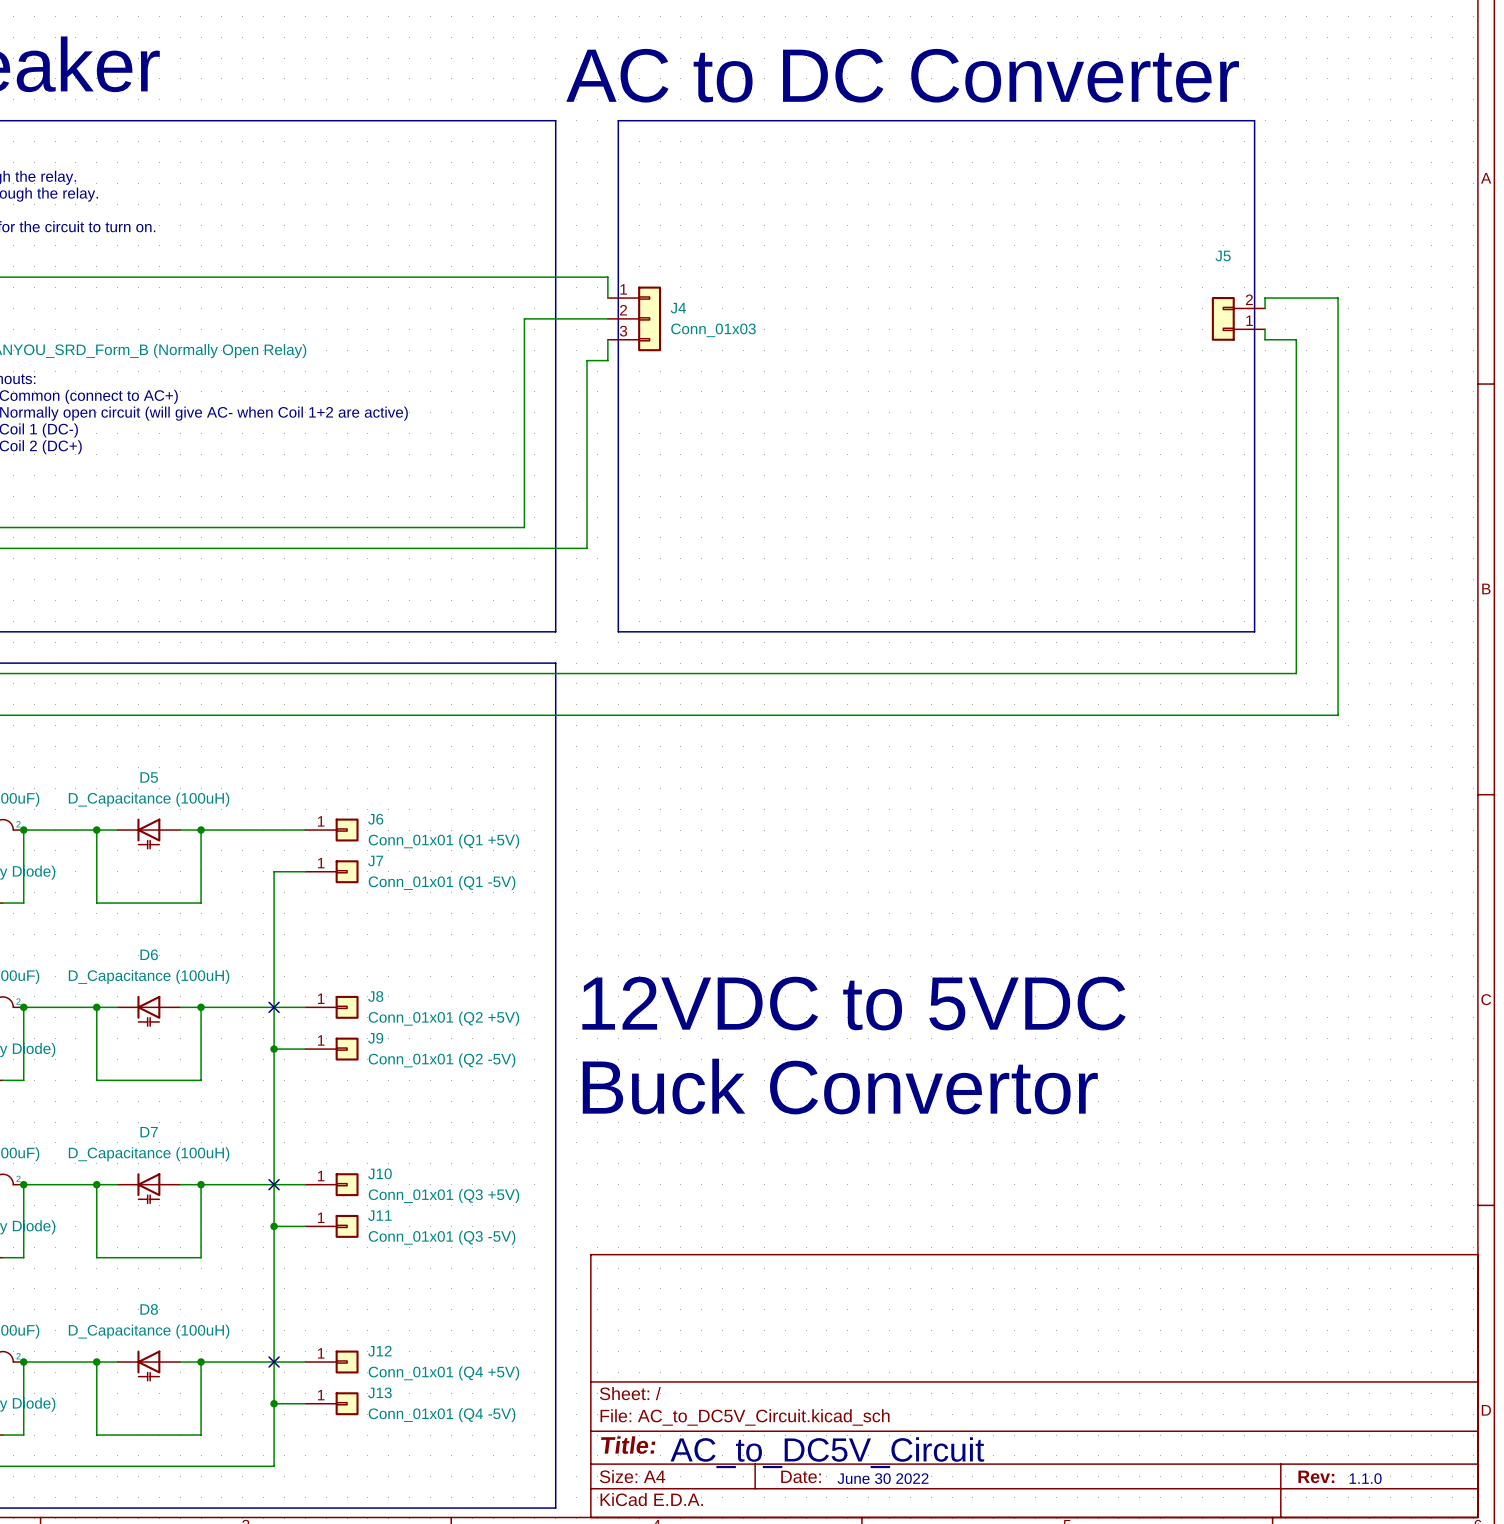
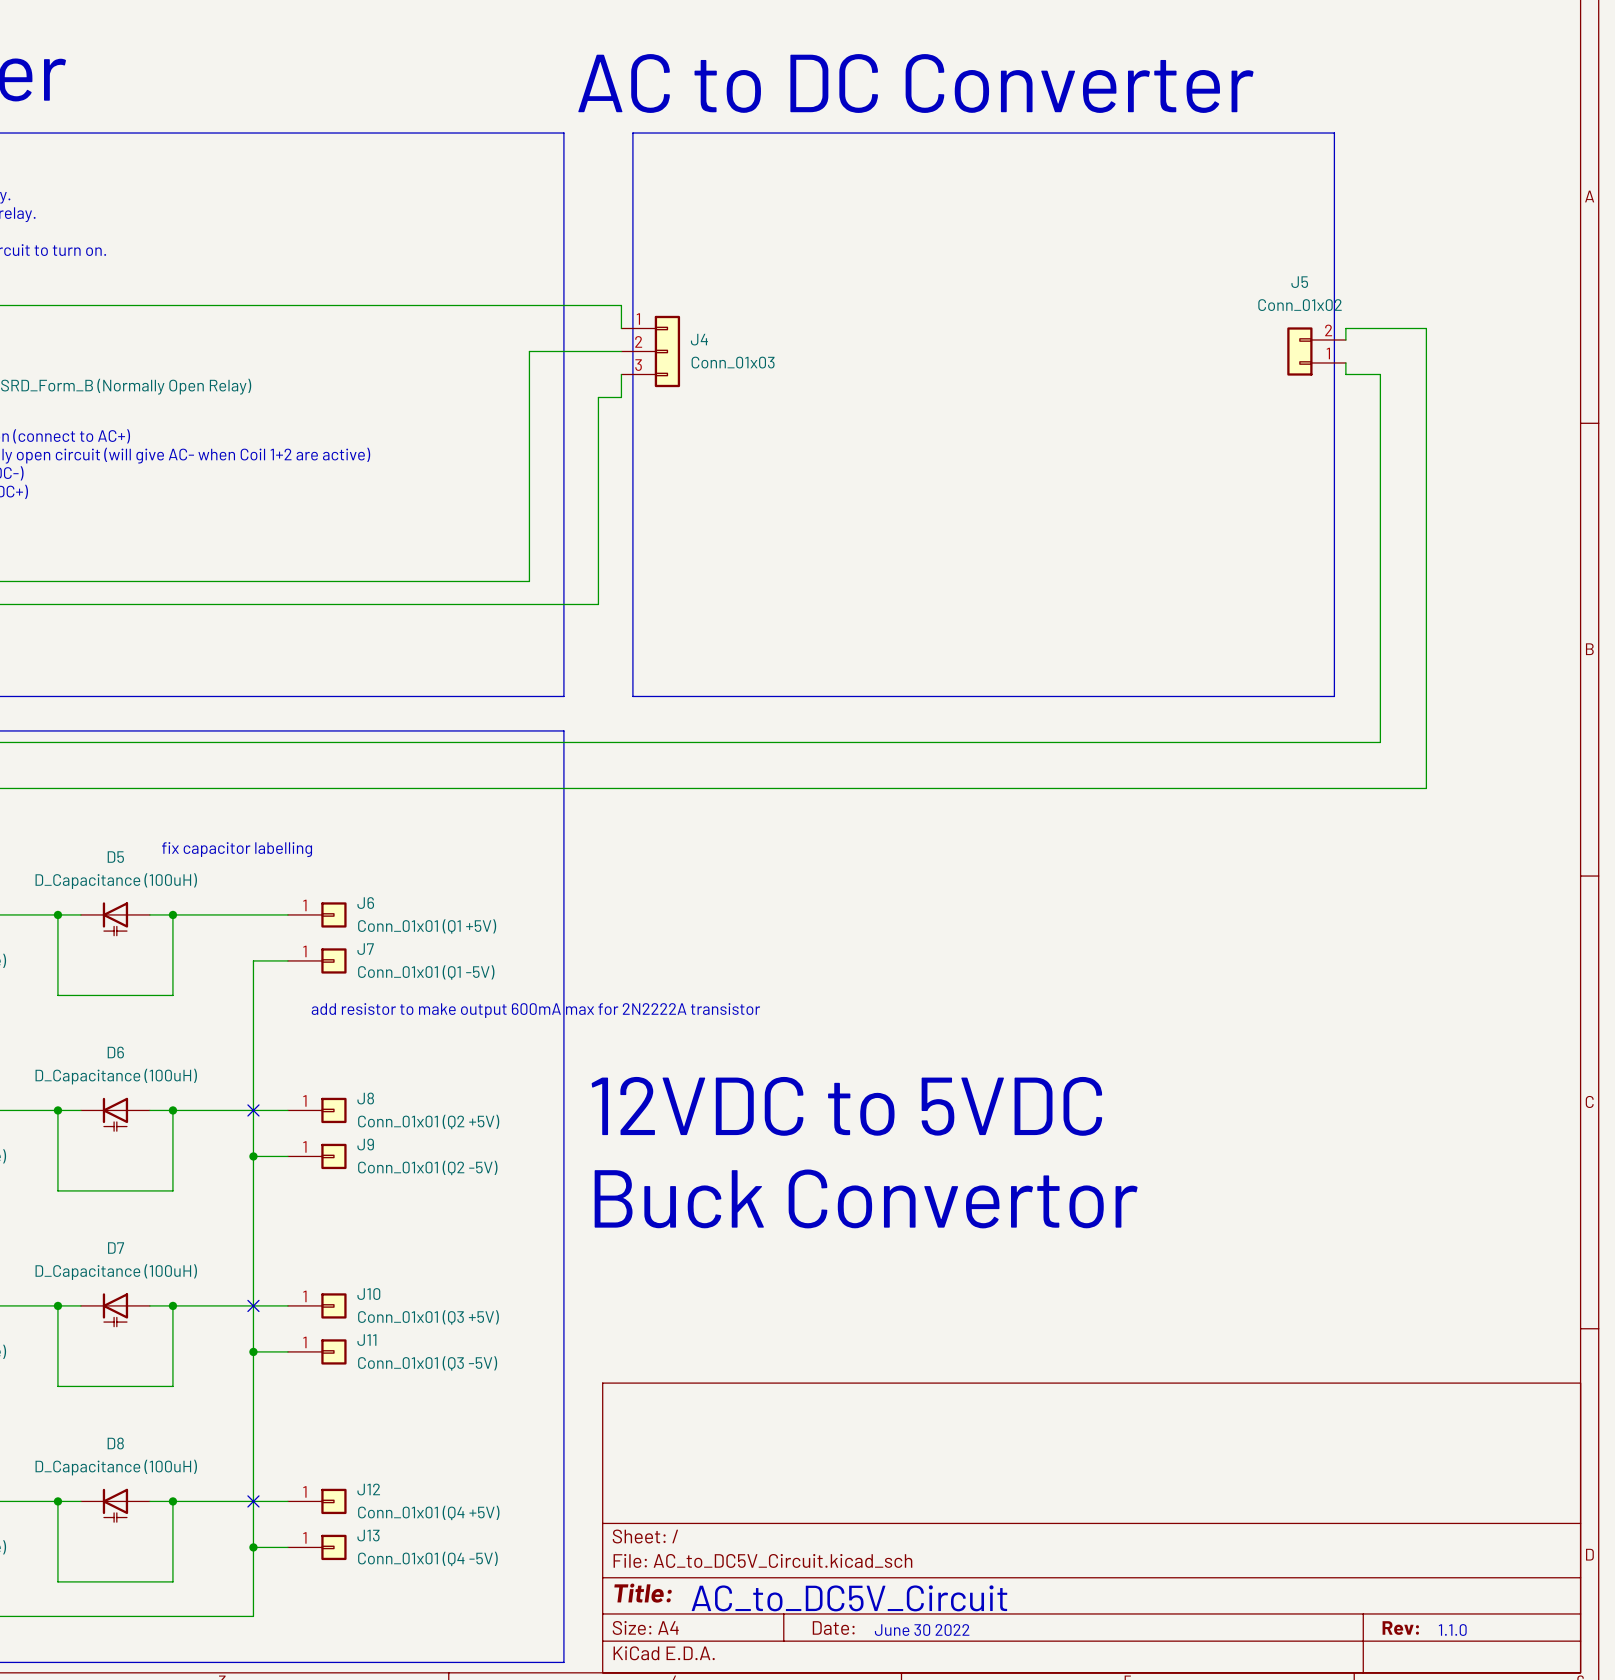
J5 value: none -> Conn_01x02 (1300, 305)
text: none -> fix capacitor labelling (237, 849)
text: none -> add resistor to make output 600mA max for 2N2222A transistor (535, 1010)

